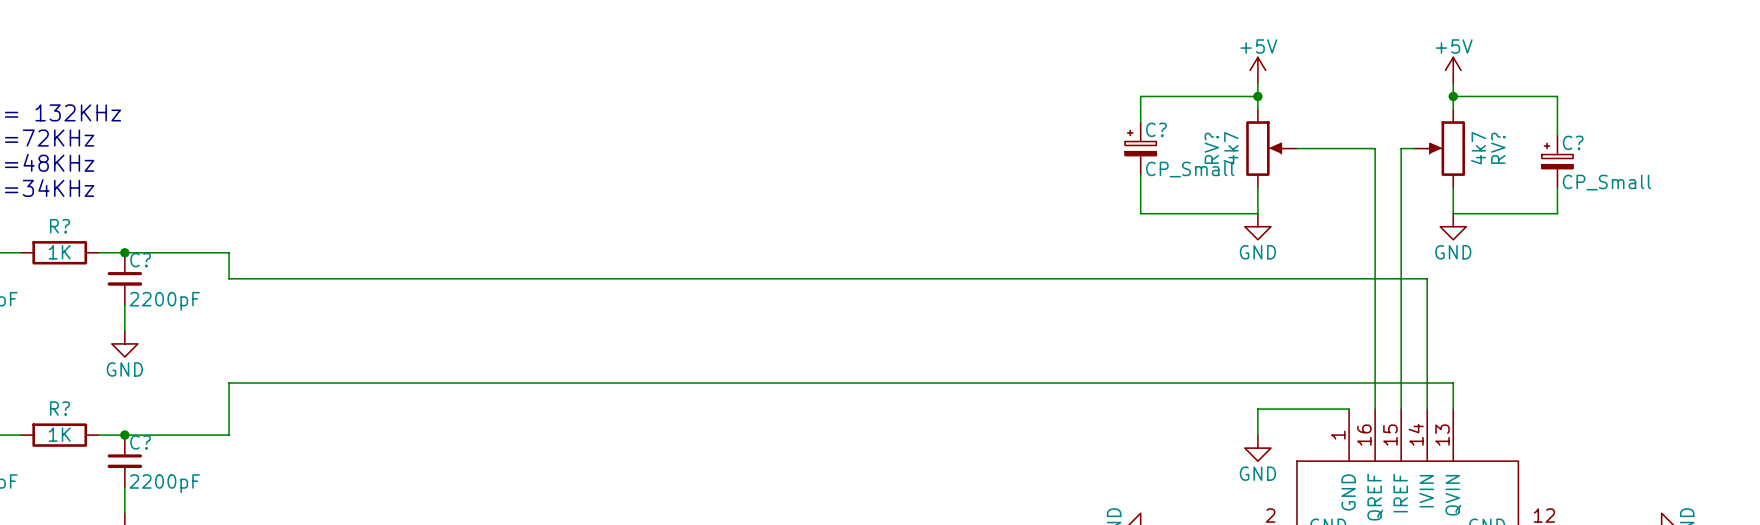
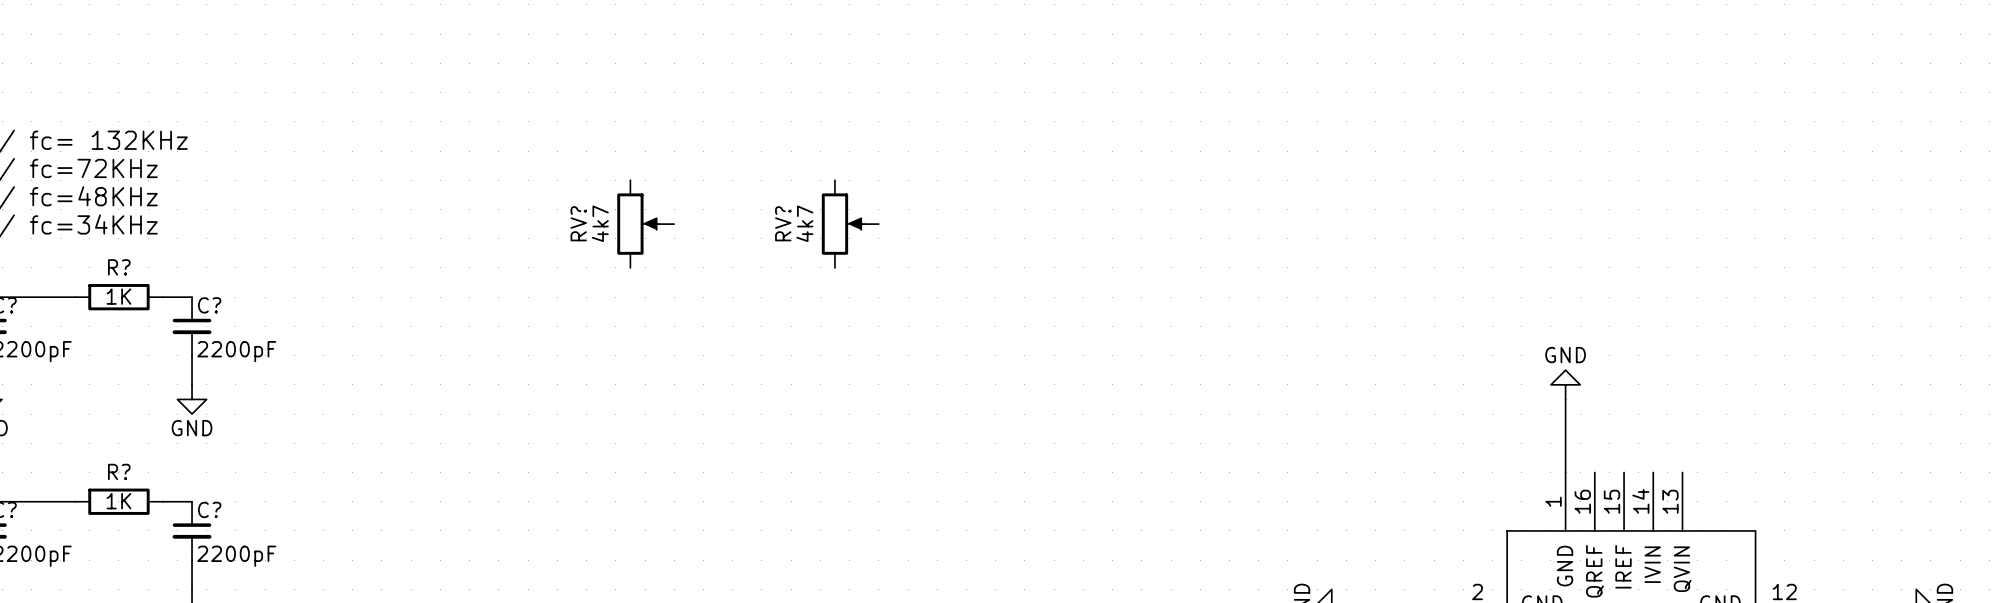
power symbol: +5V (1257, 70) -> none
power symbol: +5V (1453, 70) -> none
wire: (1257, 83) (1257, 109) -> none
wire: (1453, 83) (1453, 109) -> none
wire: (1257, 96) (1140, 96) (1140, 122) -> none
junction: (1257, 96) -> none
wire: (1453, 96) (1557, 96) (1557, 135) -> none
junction: (1453, 96) -> none
C?: CP_Small (1140, 148) -> none
RV?: 4k7 (1271, 148) -> none
wire: (1296, 148) (1375, 148) (1375, 409) -> none
wire: (1414, 148) (1401, 148) (1401, 409) -> none
RV?: 4k7 (1439, 148) -> none
C?: CP_Small (1557, 161) -> none
wire: (1140, 174) (1140, 213) (1257, 213) (1257, 187) -> none
RV?: none -> 4k7 (645, 224)
RV?: none -> 4k7 (850, 224)
wire: (1453, 187) (1453, 213) (1557, 213) (1557, 187) -> none
power symbol: GND (1257, 226) -> none
power symbol: GND (1453, 226) -> none
wire: (124, 252) (229, 252) (229, 278) (1427, 278) (1427, 409) -> none
junction: (124, 252) -> none
power symbol: none -> GND (1565, 384)
wire: (1349, 409) (1257, 409) (1257, 435) -> (1565, 472) (1565, 399)
wire: (1453, 409) (1453, 383) (229, 383) (229, 435) (124, 435) -> none
junction: (124, 435) -> none
power symbol: GND (1257, 448) -> none

